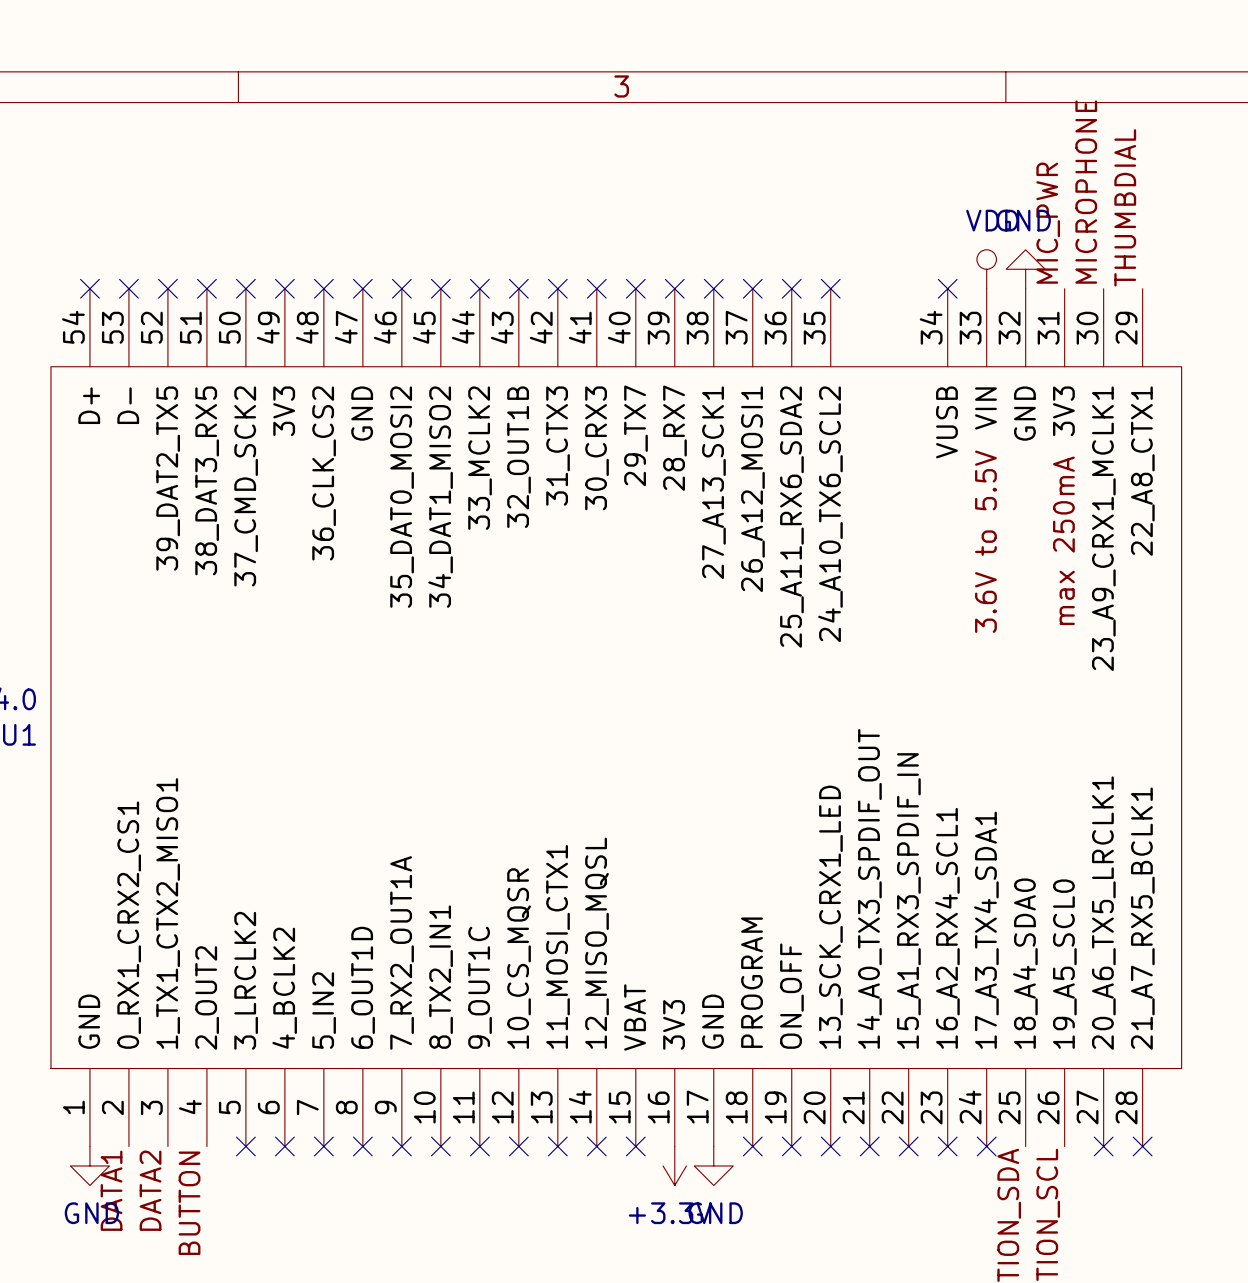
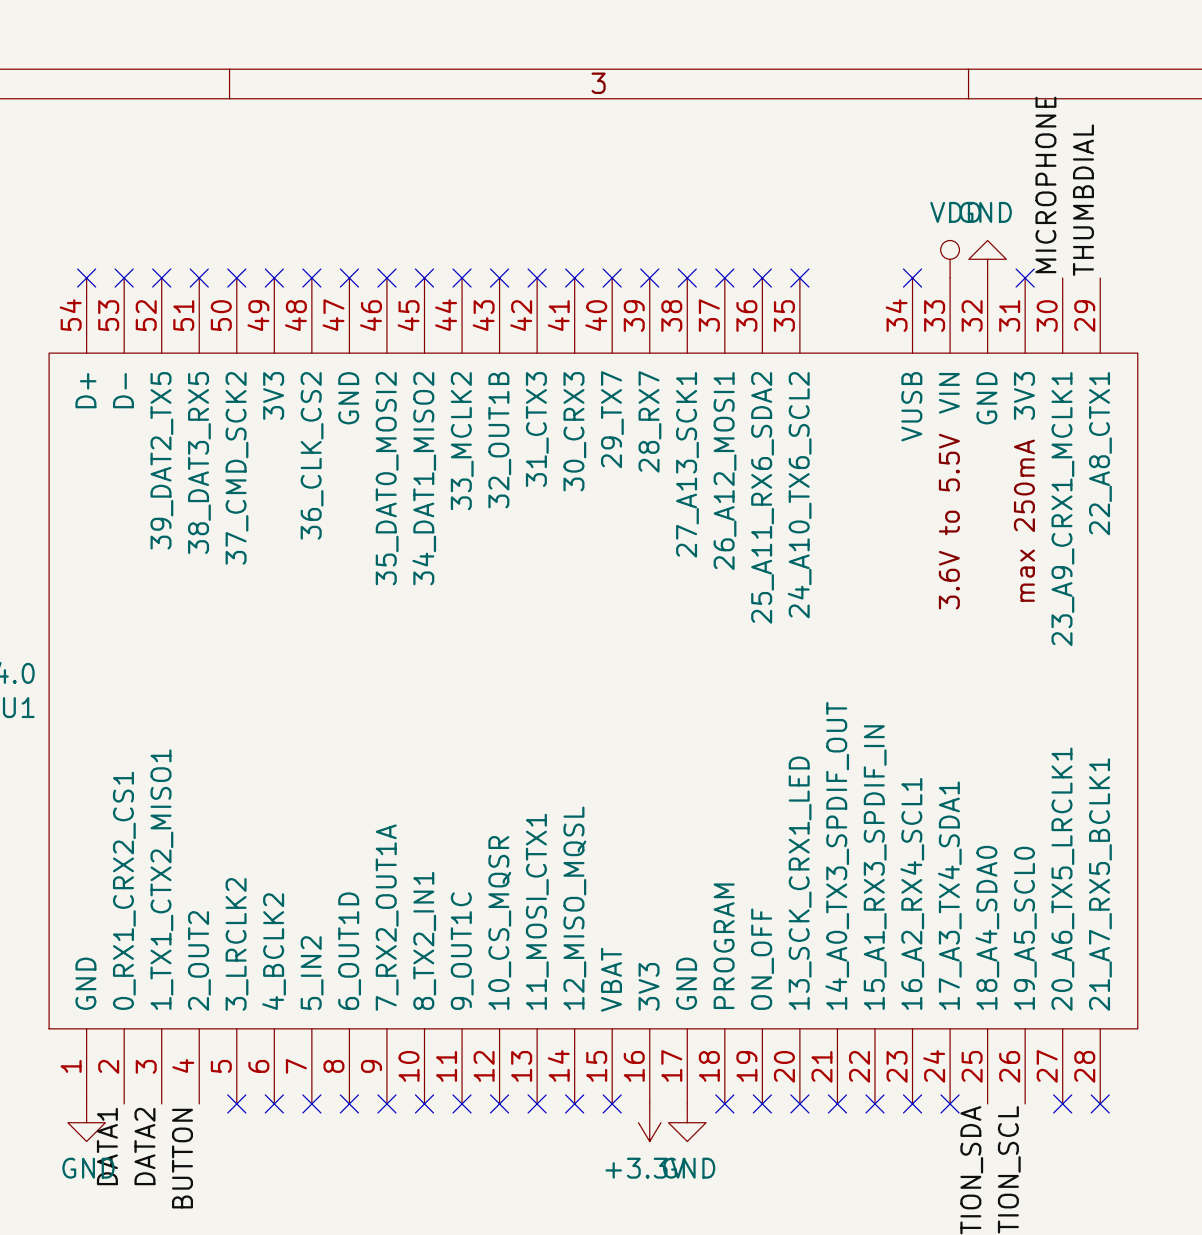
label: MIC_PWR (1048, 223) -> none
no-connect mark: none -> (1025, 278)

